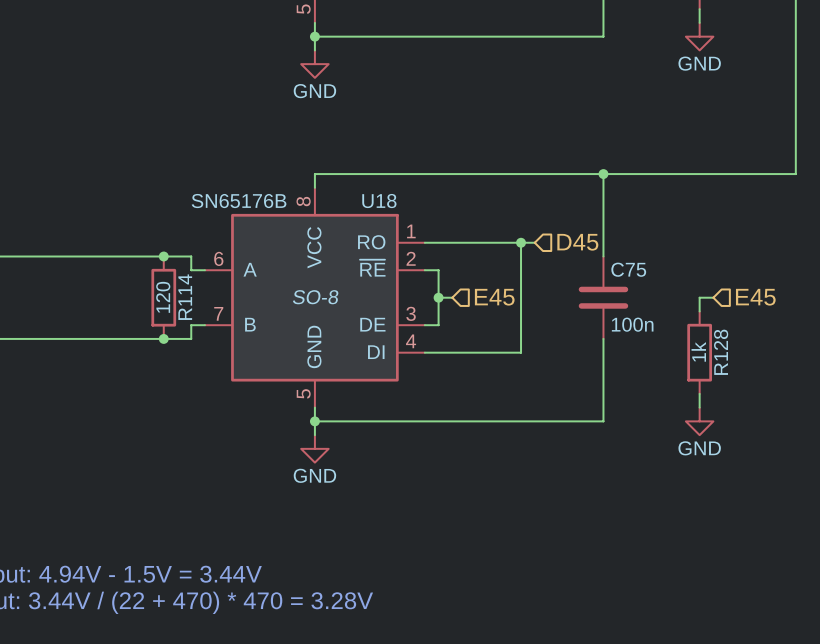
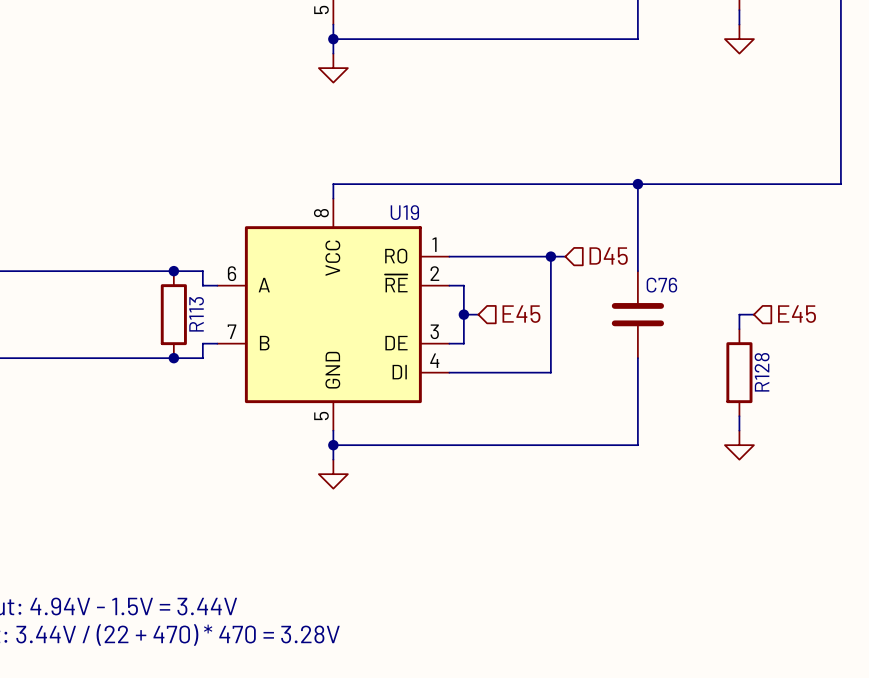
power symbol text: GND (699, 63) -> none
power symbol text: GND (314, 91) -> none
U18 value: SN65176B (239, 201) -> none
U18 name: U18 (379, 201) -> U19 (404, 212)
C75 name: C75 (628, 269) -> C76 (661, 285)
R114 value: 120 (163, 297) -> none
R114 name: R114 (185, 297) -> R113 (196, 314)
U18 text: SO-8 (315, 297) -> none
C75 value: 100n (632, 324) -> none
R128 value: 1k (698, 351) -> none
power symbol text: GND (699, 448) -> none
power symbol text: GND (314, 475) -> none

